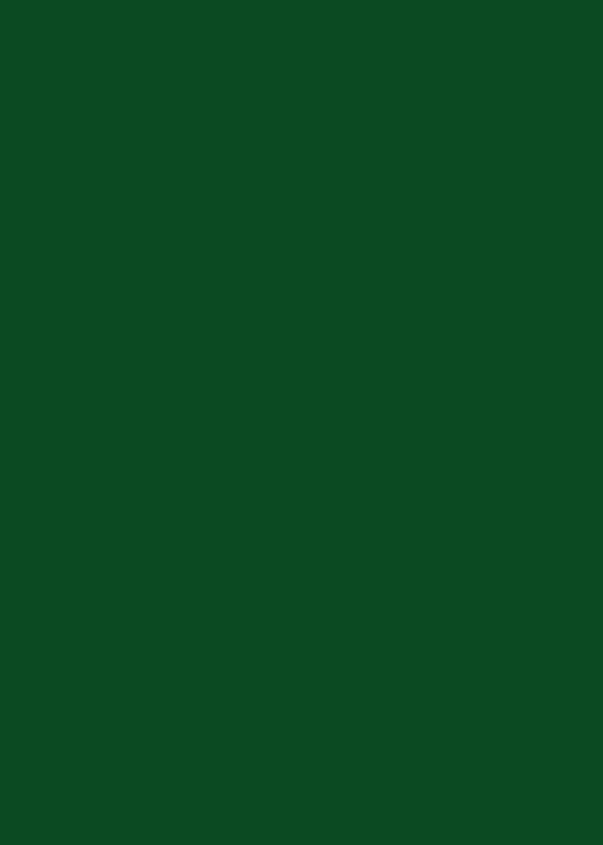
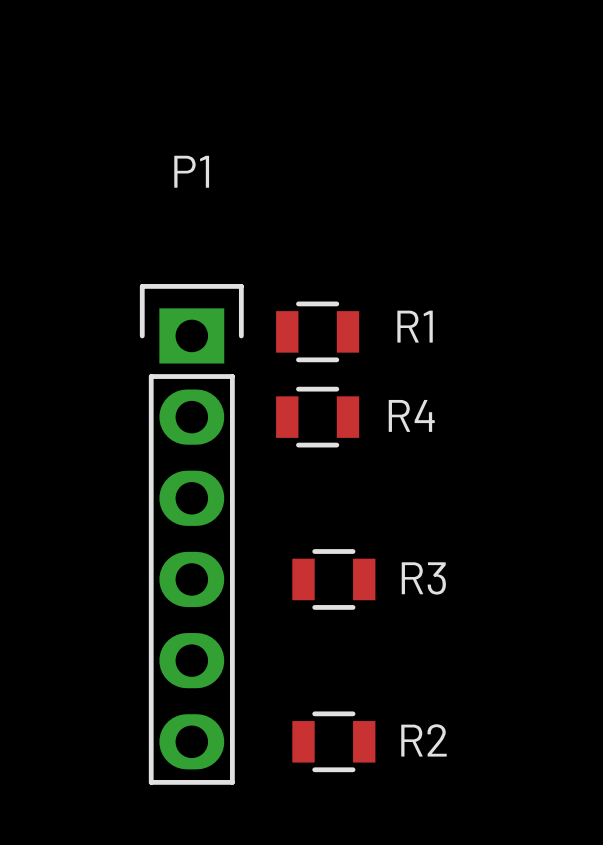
R1: none -> (317, 331)
R4: none -> (317, 417)
P1: none -> (191, 534)
R3: none -> (333, 579)
R2: none -> (333, 741)

